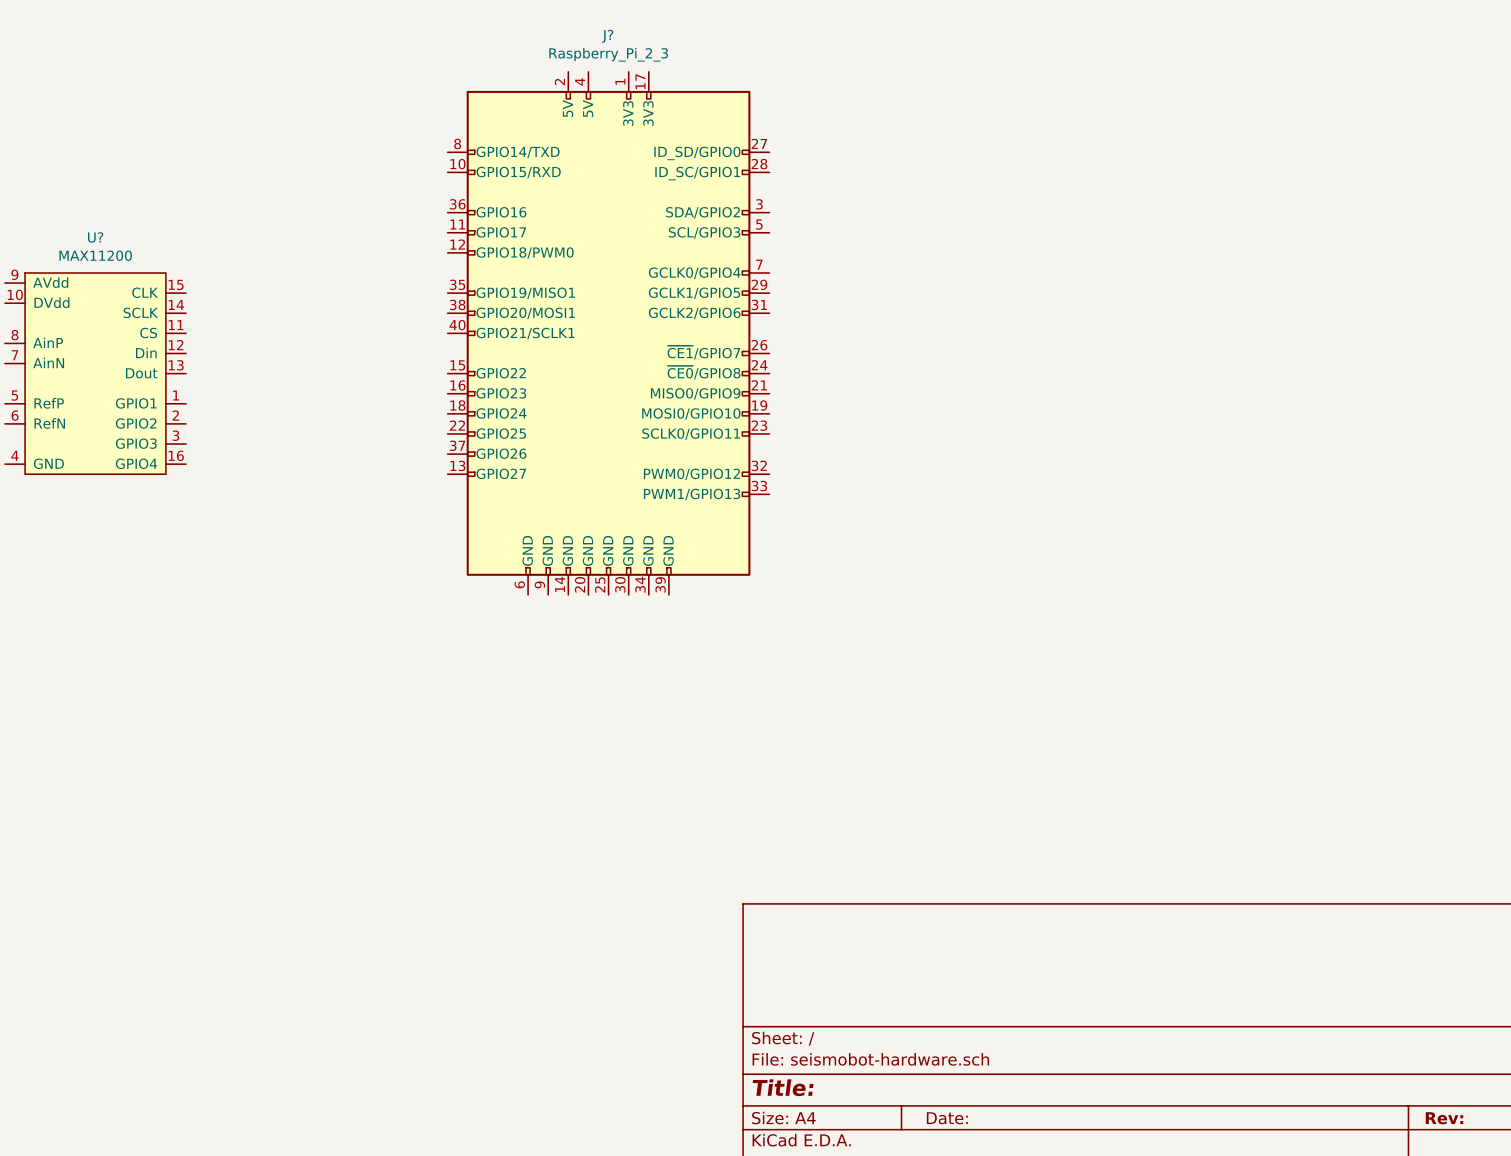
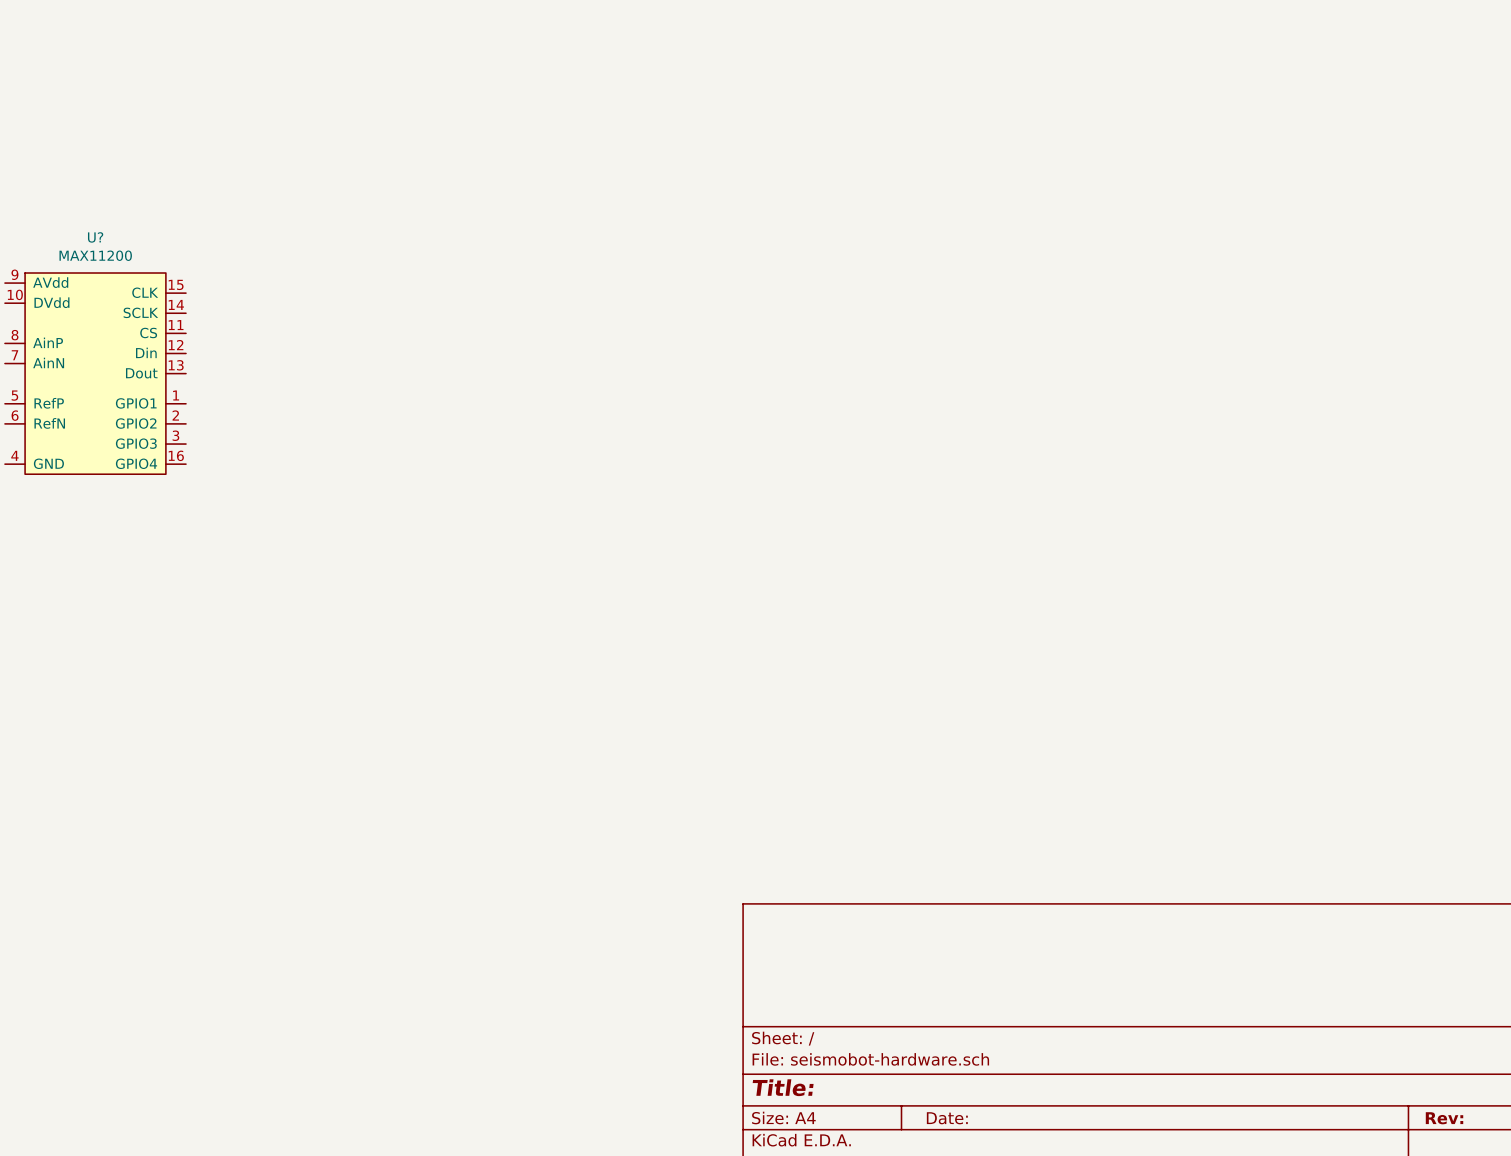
J?: Raspberry_Pi_2_3 (608, 333) -> none

